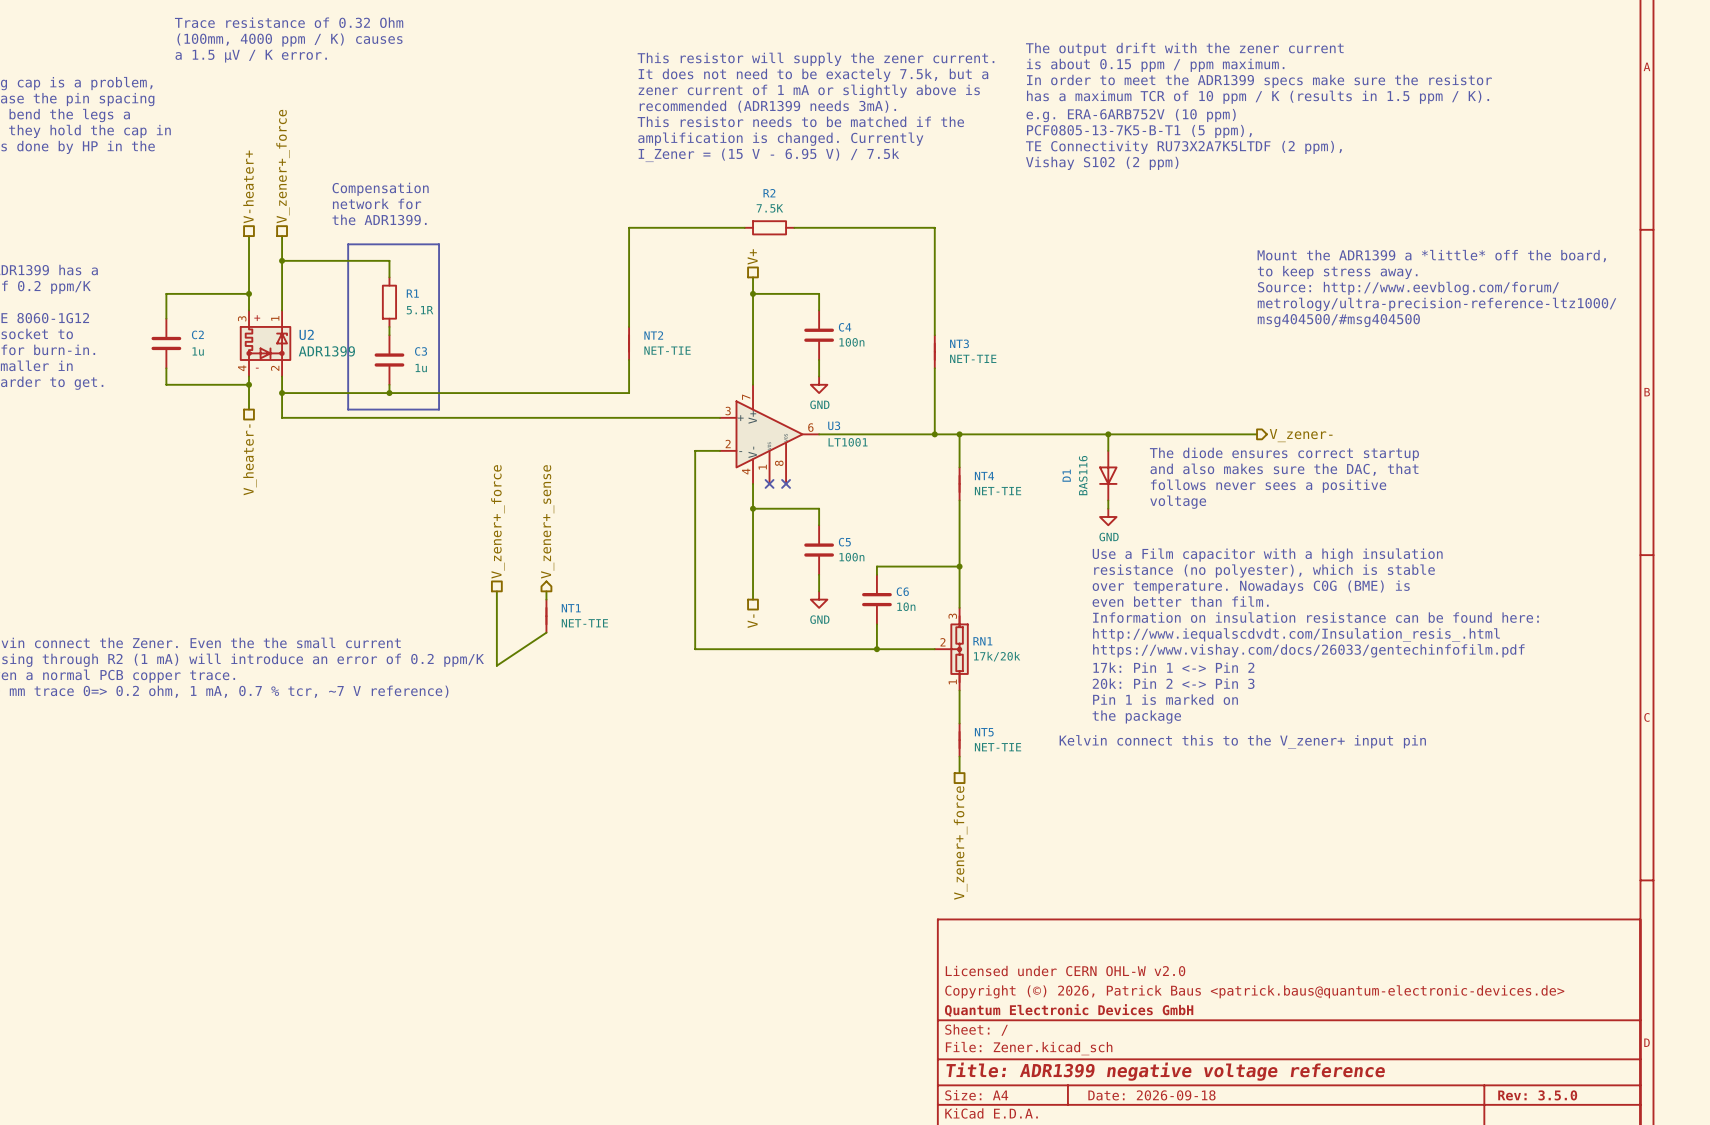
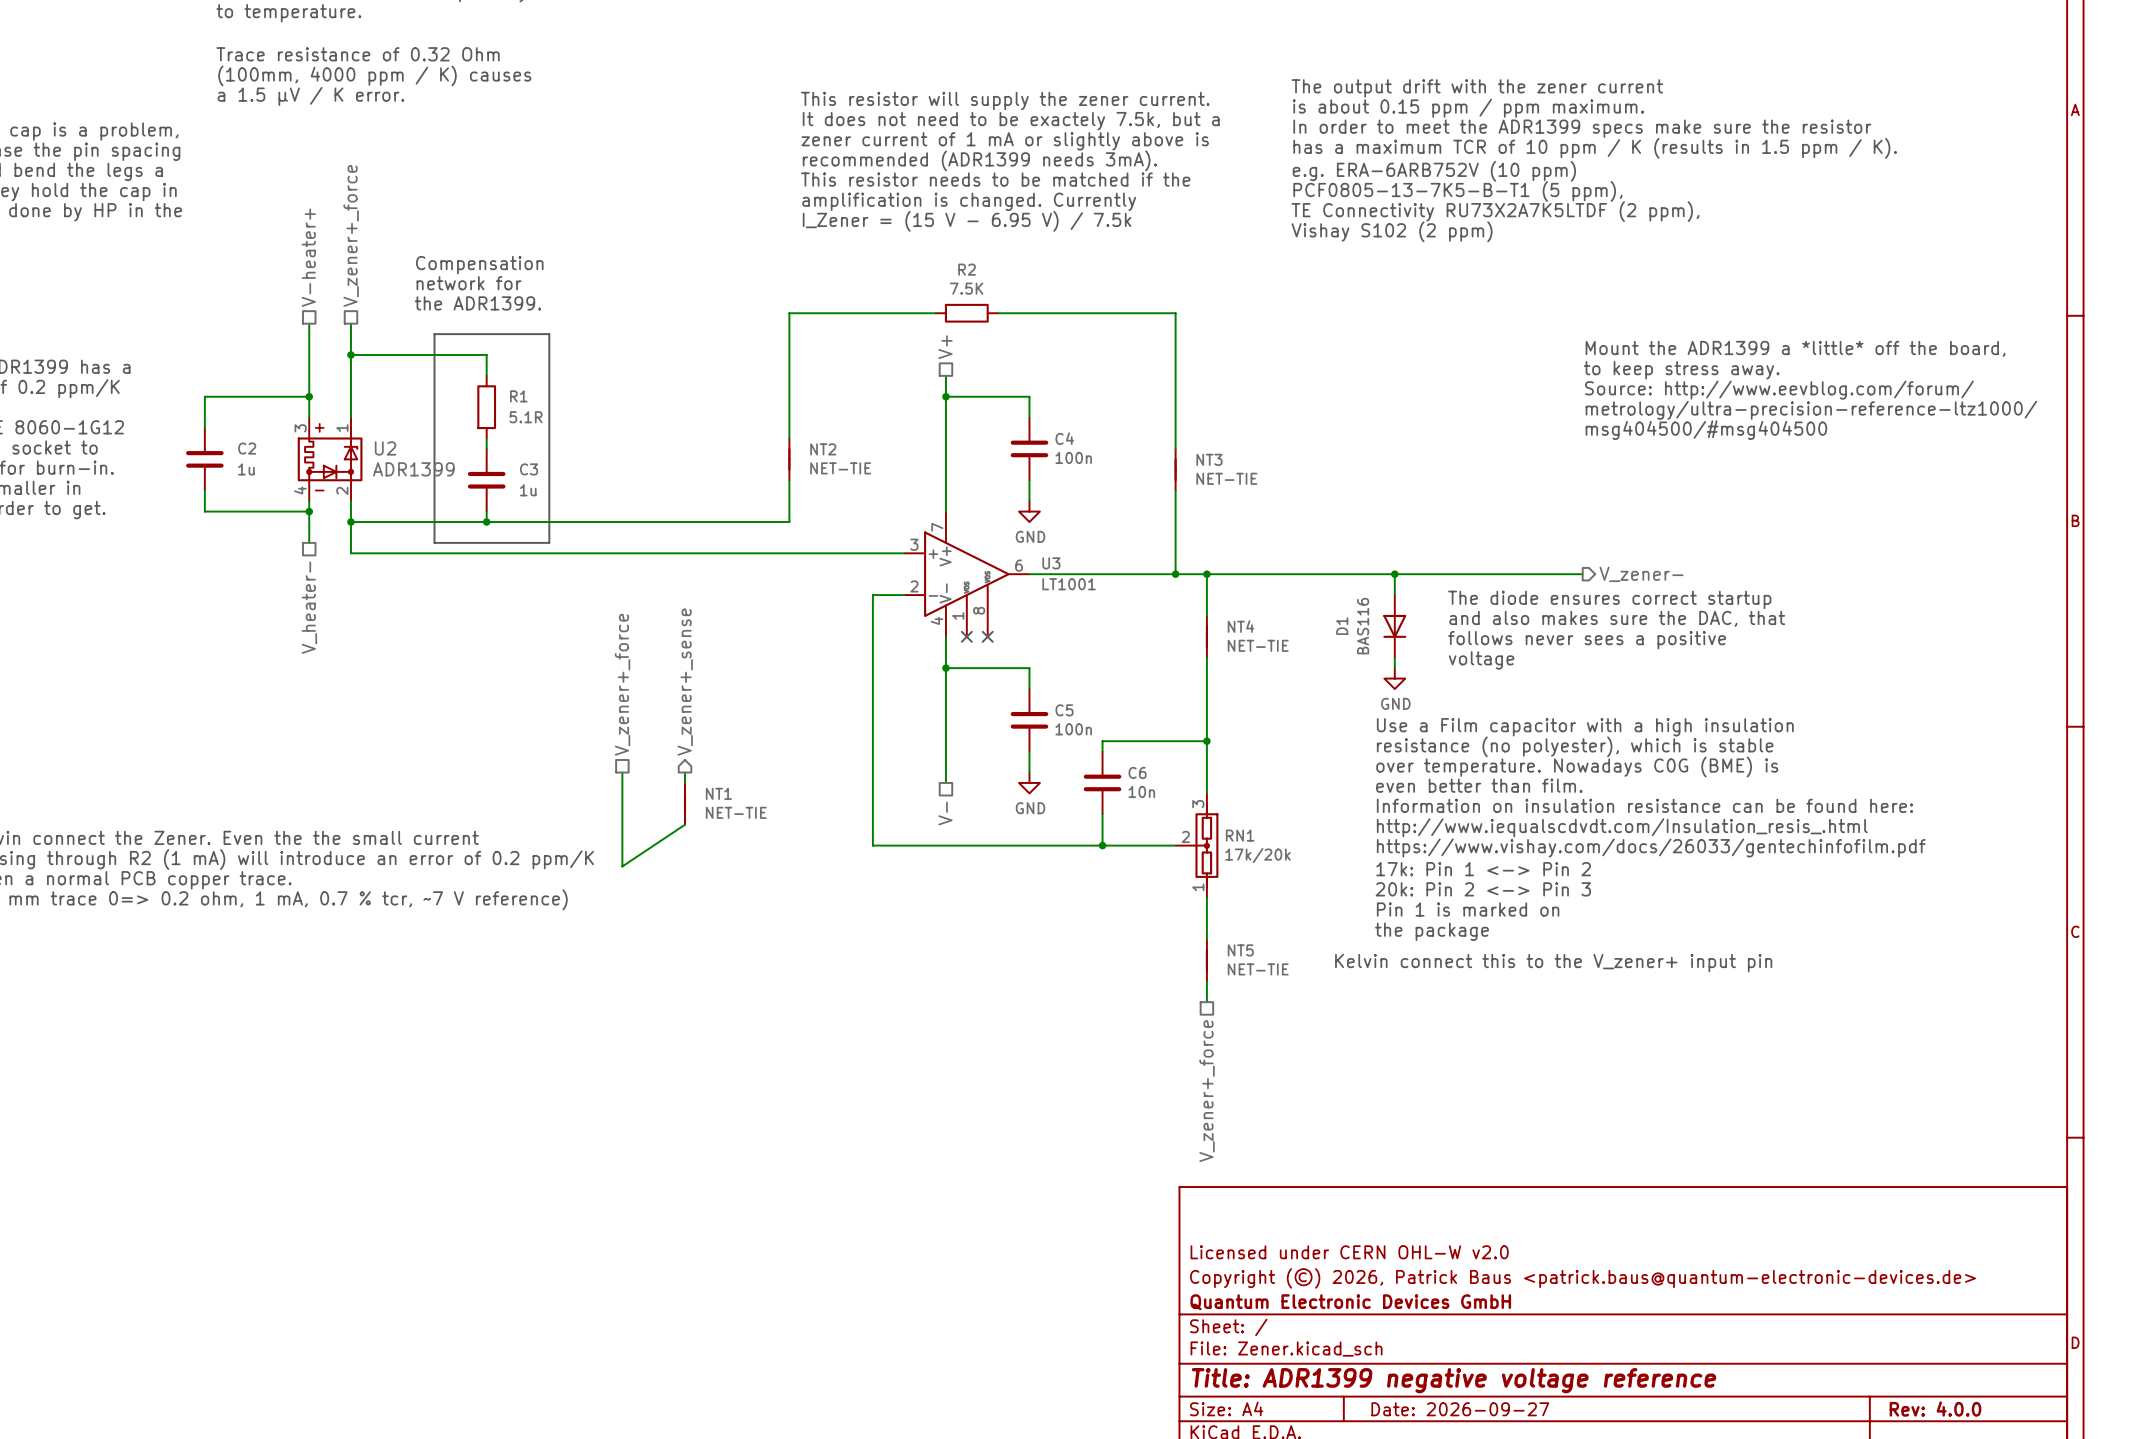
title block: Date: 2026-09-18 (1151, 1095) -> Date: 2026-09-27 (1460, 1409)
title block: Rev: 3.5.0 (1537, 1095) -> Rev: 4.0.0 (1935, 1408)

